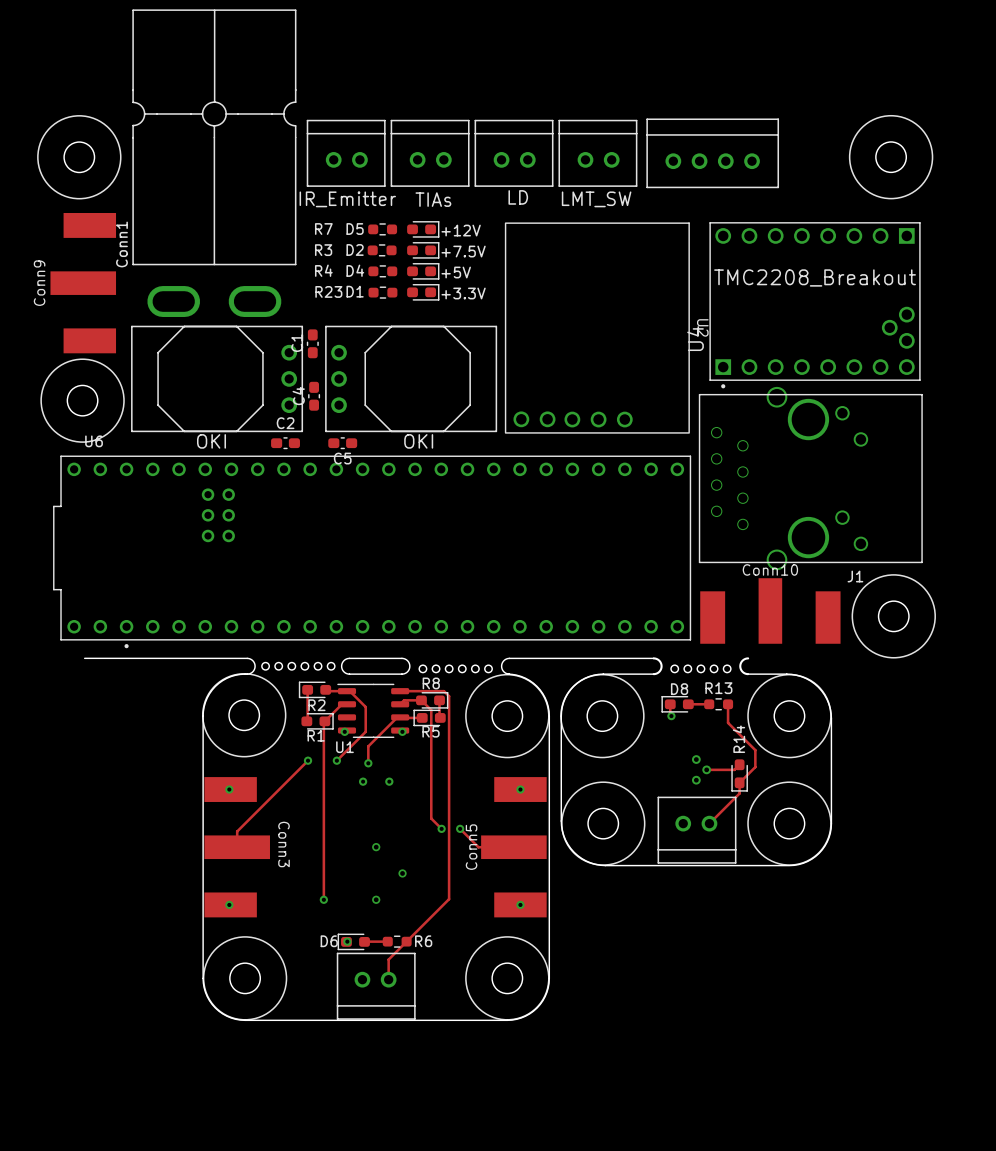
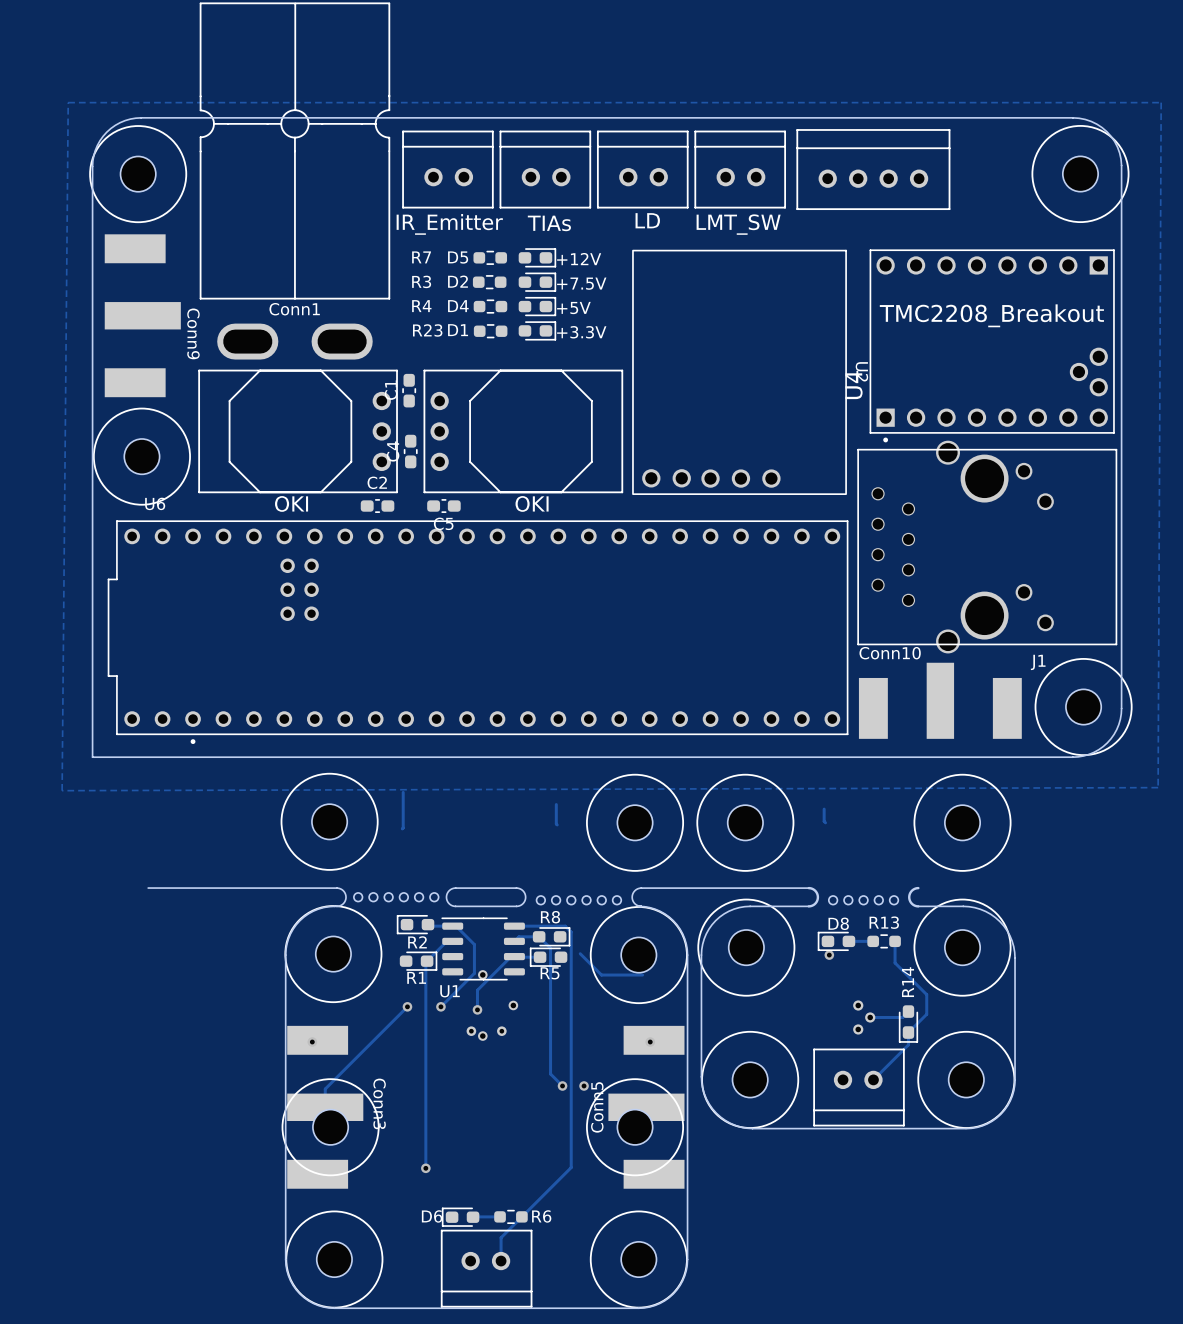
zone outline: none -> (68, 102) (1161, 102) (1158, 787) (62, 790) (68, 102)
board edge: none -> (141, 117) (1072, 117) (1085, 119) (1096, 124) (1106, 131) (1114, 141) (1119, 153) (1121, 165) (1121, 708) (1120, 719) (1114, 734) (1107, 742) (1094, 752) (1072, 757) (92, 757) (92, 161) (100, 140) (110, 128) (125, 120) (141, 117)
Conn1 name rotation: 0° (121, 244) -> 90° clockwise (294, 309)
Conn1 name position: Conn1 (121, 244) -> Conn1 (294, 309)
Conn9 rotation: 0° (83, 283) -> 180° (142, 315)
Conn10 name position: Conn10 (770, 569) -> Conn10 (890, 653)
board edge: (84, 658) (247, 658) (254, 663) (254, 669) (250, 673) (231, 676) (215, 686) (207, 697) (203, 711) (203, 983) (207, 996) (212, 1004) (218, 1011) (231, 1017) (245, 1020) (507, 1020) (525, 1016) (540, 1004) (546, 992) (549, 978) (549, 711) (542, 693) (533, 683) (521, 676) (507, 674) (509, 674) (503, 671) (502, 663) (507, 658) (653, 658) (661, 663) (660, 670) (654, 674) (603, 674) (589, 676) (577, 683) (565, 697) (561, 716) (561, 825) (565, 840) (577, 855) (590, 862) (605, 865) (788, 865) -> none
board edge: (349, 658) (402, 658) (408, 661) (409, 667) (407, 671) (402, 674) (348, 674) (343, 670) (341, 665) (344, 660) (349, 658) -> none
board edge: (748, 658) (740, 663) (740, 669) (743, 672) (791, 674) (806, 678) (821, 690) (830, 708) (830, 832) (824, 845) (815, 856) (803, 863) (789, 865) -> (918, 888) (913, 889) (909, 893) (909, 900) (913, 904) (969, 906) (985, 911) (1003, 925) (1013, 946) (1013, 1090) (1007, 1105) (996, 1117) (982, 1125) (966, 1128)
round board edge: [261, 662, 270, 671] -> none
round board edge: [274, 662, 283, 671] -> none
round board edge: [287, 662, 297, 671] -> none
round board edge: [300, 662, 310, 671] -> none
round board edge: [313, 662, 323, 671] -> none
round board edge: [326, 662, 336, 671] -> none
round board edge: [418, 664, 428, 674] -> none
round board edge: [431, 664, 441, 674] -> none
round board edge: [444, 664, 454, 674] -> none
round board edge: [458, 664, 467, 674] -> none
round board edge: [471, 664, 480, 674] -> none
round board edge: [484, 664, 493, 674] -> none
round board edge: [670, 664, 679, 674] -> none
round board edge: [683, 664, 693, 674] -> none
round board edge: [696, 664, 706, 674] -> none
round board edge: [709, 664, 719, 674] -> none
round board edge: [722, 664, 732, 674] -> none
R2 position: (315, 689) -> (415, 924)
track: (325, 689) (349, 691) (365, 707) (365, 731) (336, 760) -> (427, 924) (456, 926) (474, 944) (474, 973) (440, 1006)
track: (400, 691) (443, 691) (449, 696) (449, 899) (388, 959) (388, 979) -> (514, 926) (565, 926) (571, 932) (571, 1167) (501, 1237) (501, 1261)
R8 position: (432, 700) -> (551, 936)
track: (346, 704) (341, 704) (323, 722) (323, 899) -> (452, 941) (446, 941) (425, 962) (425, 1168)
track: (400, 704) (404, 700) (421, 700) (431, 710) (431, 818) (441, 828) -> (514, 941) (519, 936) (539, 936) (550, 948) (550, 1074) (562, 1085)
D8 position: (677, 704) -> (836, 941)
track: (688, 704) (709, 704) -> (848, 941) (873, 941)
R13 position: (718, 704) -> (884, 941)
track: (728, 704) (728, 722) (755, 750) (755, 767) (739, 782) (739, 793) (709, 823) -> (895, 941) (895, 962) (926, 994) (926, 1014) (908, 1032) (908, 1044) (873, 1079)
U1 position: (373, 710) -> (483, 948)
via: (671, 716) -> none
track: (422, 717) (397, 717) (368, 746) (368, 763) -> (540, 957) (511, 956) (477, 990) (477, 1009)
R5 position: (429, 717) -> (548, 957)
R1 position: (317, 721) -> (418, 961)
via: (344, 731) -> none
via: (402, 731) -> none
track: (308, 760) (237, 831) (237, 847) -> (407, 1006) (325, 1089) (325, 1107)
via: (308, 760) -> none
via: (336, 760) -> none
via: (368, 763) -> none
track: (739, 764) (734, 769) (706, 769) -> (908, 1011) (902, 1017) (870, 1017)
part position: (701, 769) -> (864, 1017)
board edge: none -> (148, 888) (336, 888) (341, 889) (345, 893) (345, 900) (341, 905) (318, 909) (299, 920) (290, 933) (285, 949) (285, 1264) (290, 1280) (296, 1289) (304, 1297) (318, 1305) (334, 1308) (638, 1308) (659, 1303) (676, 1289) (684, 1275) (687, 1259) (687, 949) (682, 933) (669, 916) (654, 909) (638, 906) (641, 906) (634, 902) (632, 894) (638, 888) (808, 888) (813, 889) (817, 893) (816, 901) (809, 906) (750, 906) (734, 909) (719, 916) (706, 933) (701, 955) (701, 1082) (709, 1104) (720, 1117) (735, 1125) (752, 1128) (965, 1128)
board edge: none -> (455, 888) (517, 888) (524, 892) (525, 898) (522, 904) (517, 906) (454, 906) (449, 903) (446, 897) (449, 890) (455, 888)
round board edge: none -> [353, 892, 364, 903]
round board edge: none -> [368, 892, 379, 903]
round board edge: none -> [383, 892, 394, 903]
round board edge: none -> [398, 892, 409, 903]
round board edge: none -> [414, 892, 424, 903]
round board edge: none -> [429, 892, 440, 903]
R14 position: (739, 775) -> (908, 1023)
round board edge: none -> [535, 895, 546, 906]
round board edge: none -> [551, 895, 561, 906]
round board edge: none -> [566, 895, 577, 906]
round board edge: none -> [581, 895, 592, 906]
round board edge: none -> [596, 895, 607, 906]
round board edge: none -> [612, 895, 622, 906]
round board edge: none -> [828, 895, 839, 906]
round board edge: none -> [843, 895, 854, 906]
round board edge: none -> [858, 895, 869, 906]
round board edge: none -> [873, 895, 884, 906]
round board edge: none -> [889, 895, 899, 906]
part position: (376, 781) -> (486, 1031)
via: (229, 789) -> none
via: (520, 789) -> none
via: (441, 828) -> none
via: (460, 828) -> none
part: none -> (333, 954)
part: none -> (638, 955)
via: none -> (829, 955)
part position: (697, 830) -> (859, 1087)
Conn3 position: (237, 847) -> (325, 1107)
Conn5 position: (513, 847) -> (646, 1107)
via: none -> (407, 1006)
via: none -> (440, 1006)
via: none -> (477, 1009)
via: (323, 899) -> none
part: none -> (750, 1079)
part: none -> (966, 1079)
via: (347, 941) -> none
D6 position: (353, 941) -> (460, 1217)
track: (364, 941) (387, 941) -> (473, 1217) (499, 1217)
R6 position: (397, 941) -> (510, 1216)
via: none -> (562, 1085)
via: none -> (584, 1085)
part position: (376, 986) -> (486, 1268)
via: none -> (425, 1168)
part: none -> (334, 1259)
part: none -> (638, 1259)

